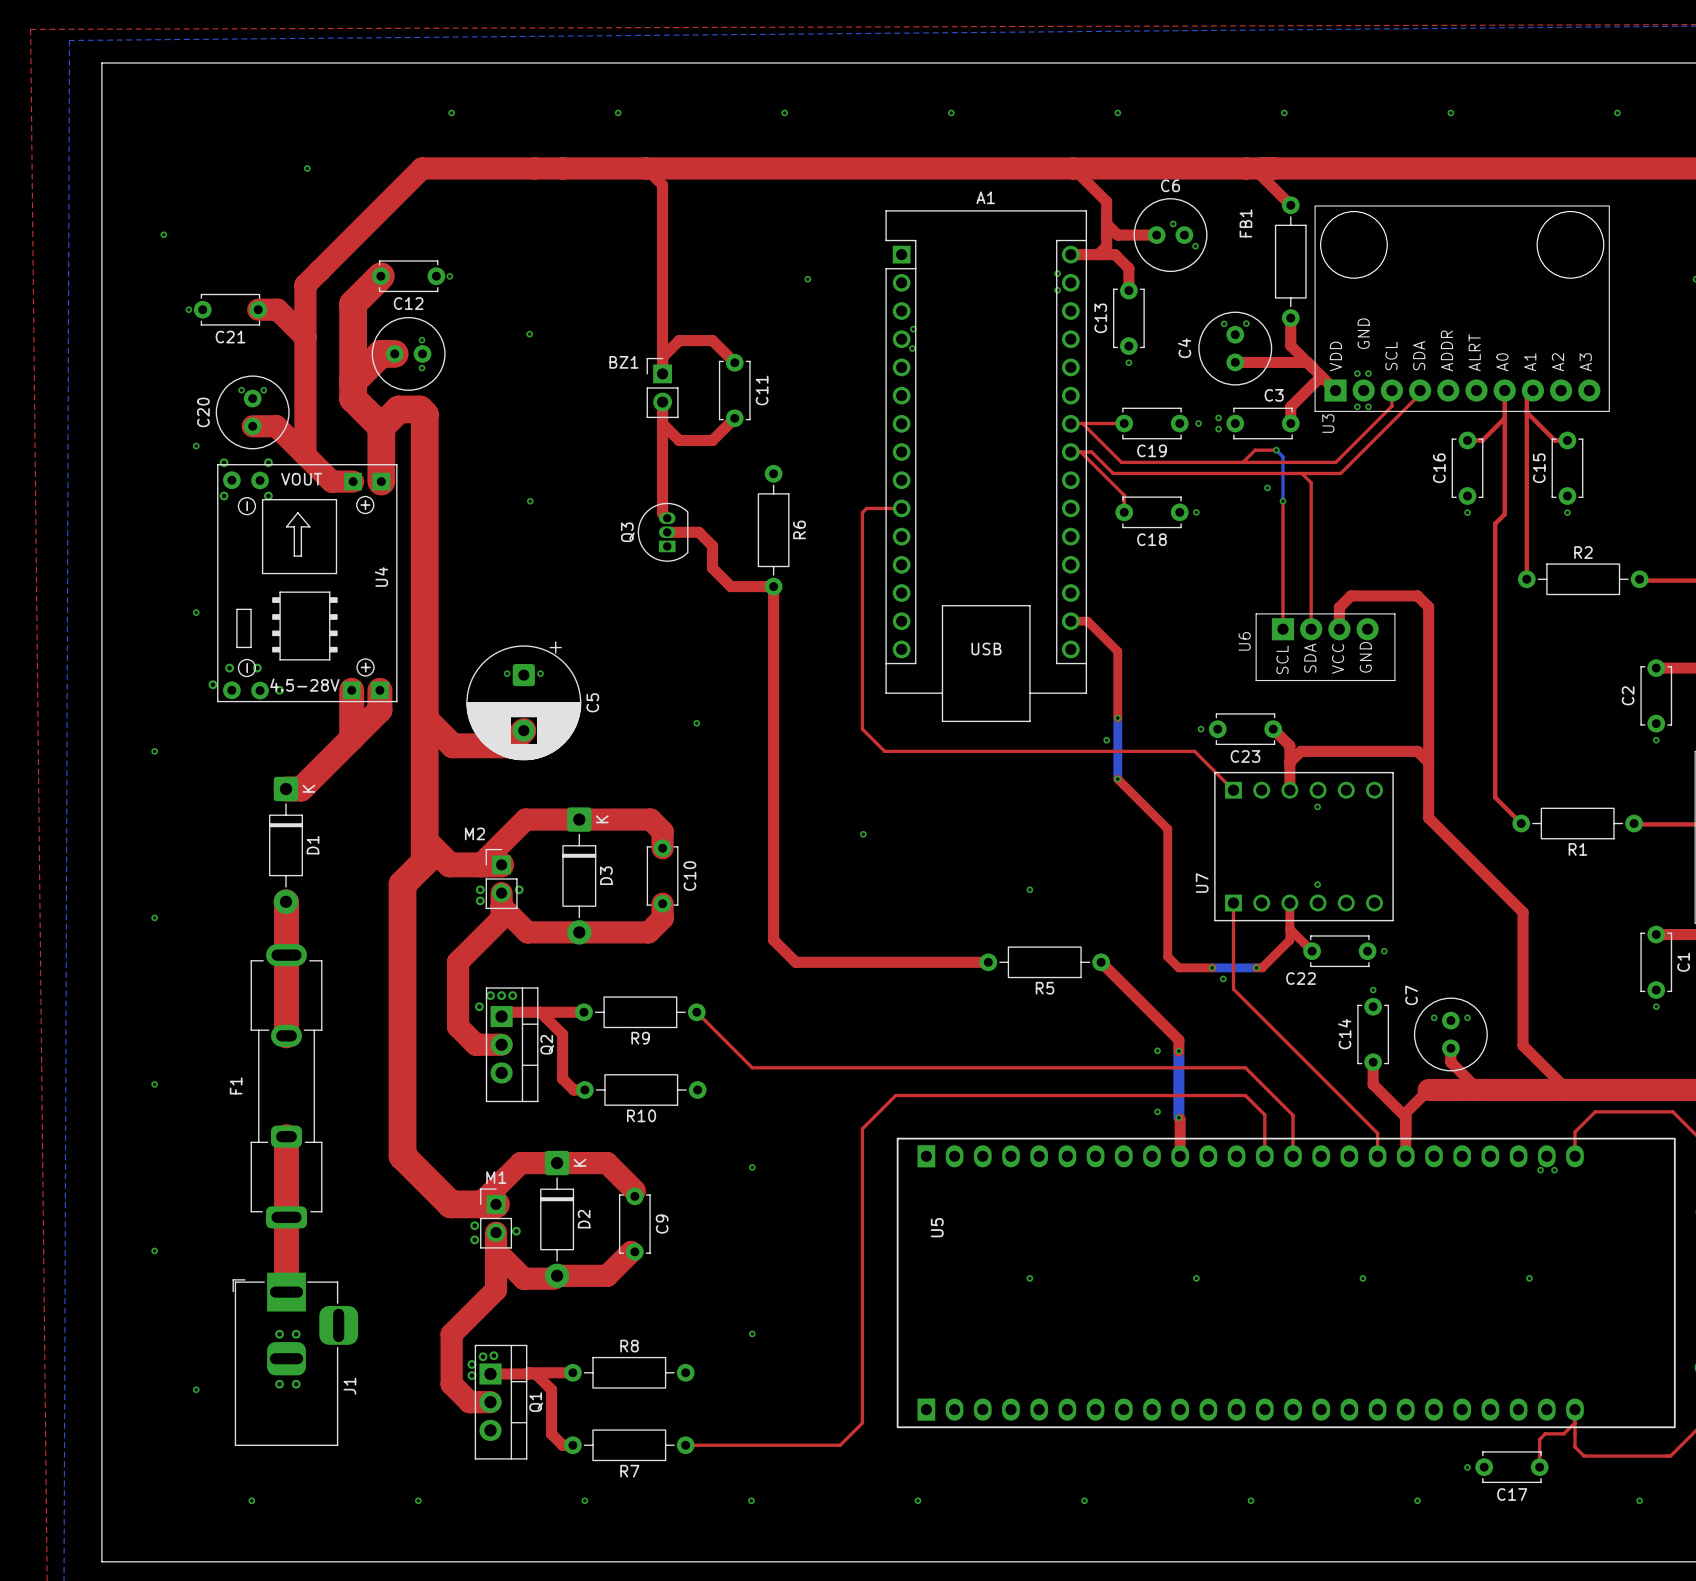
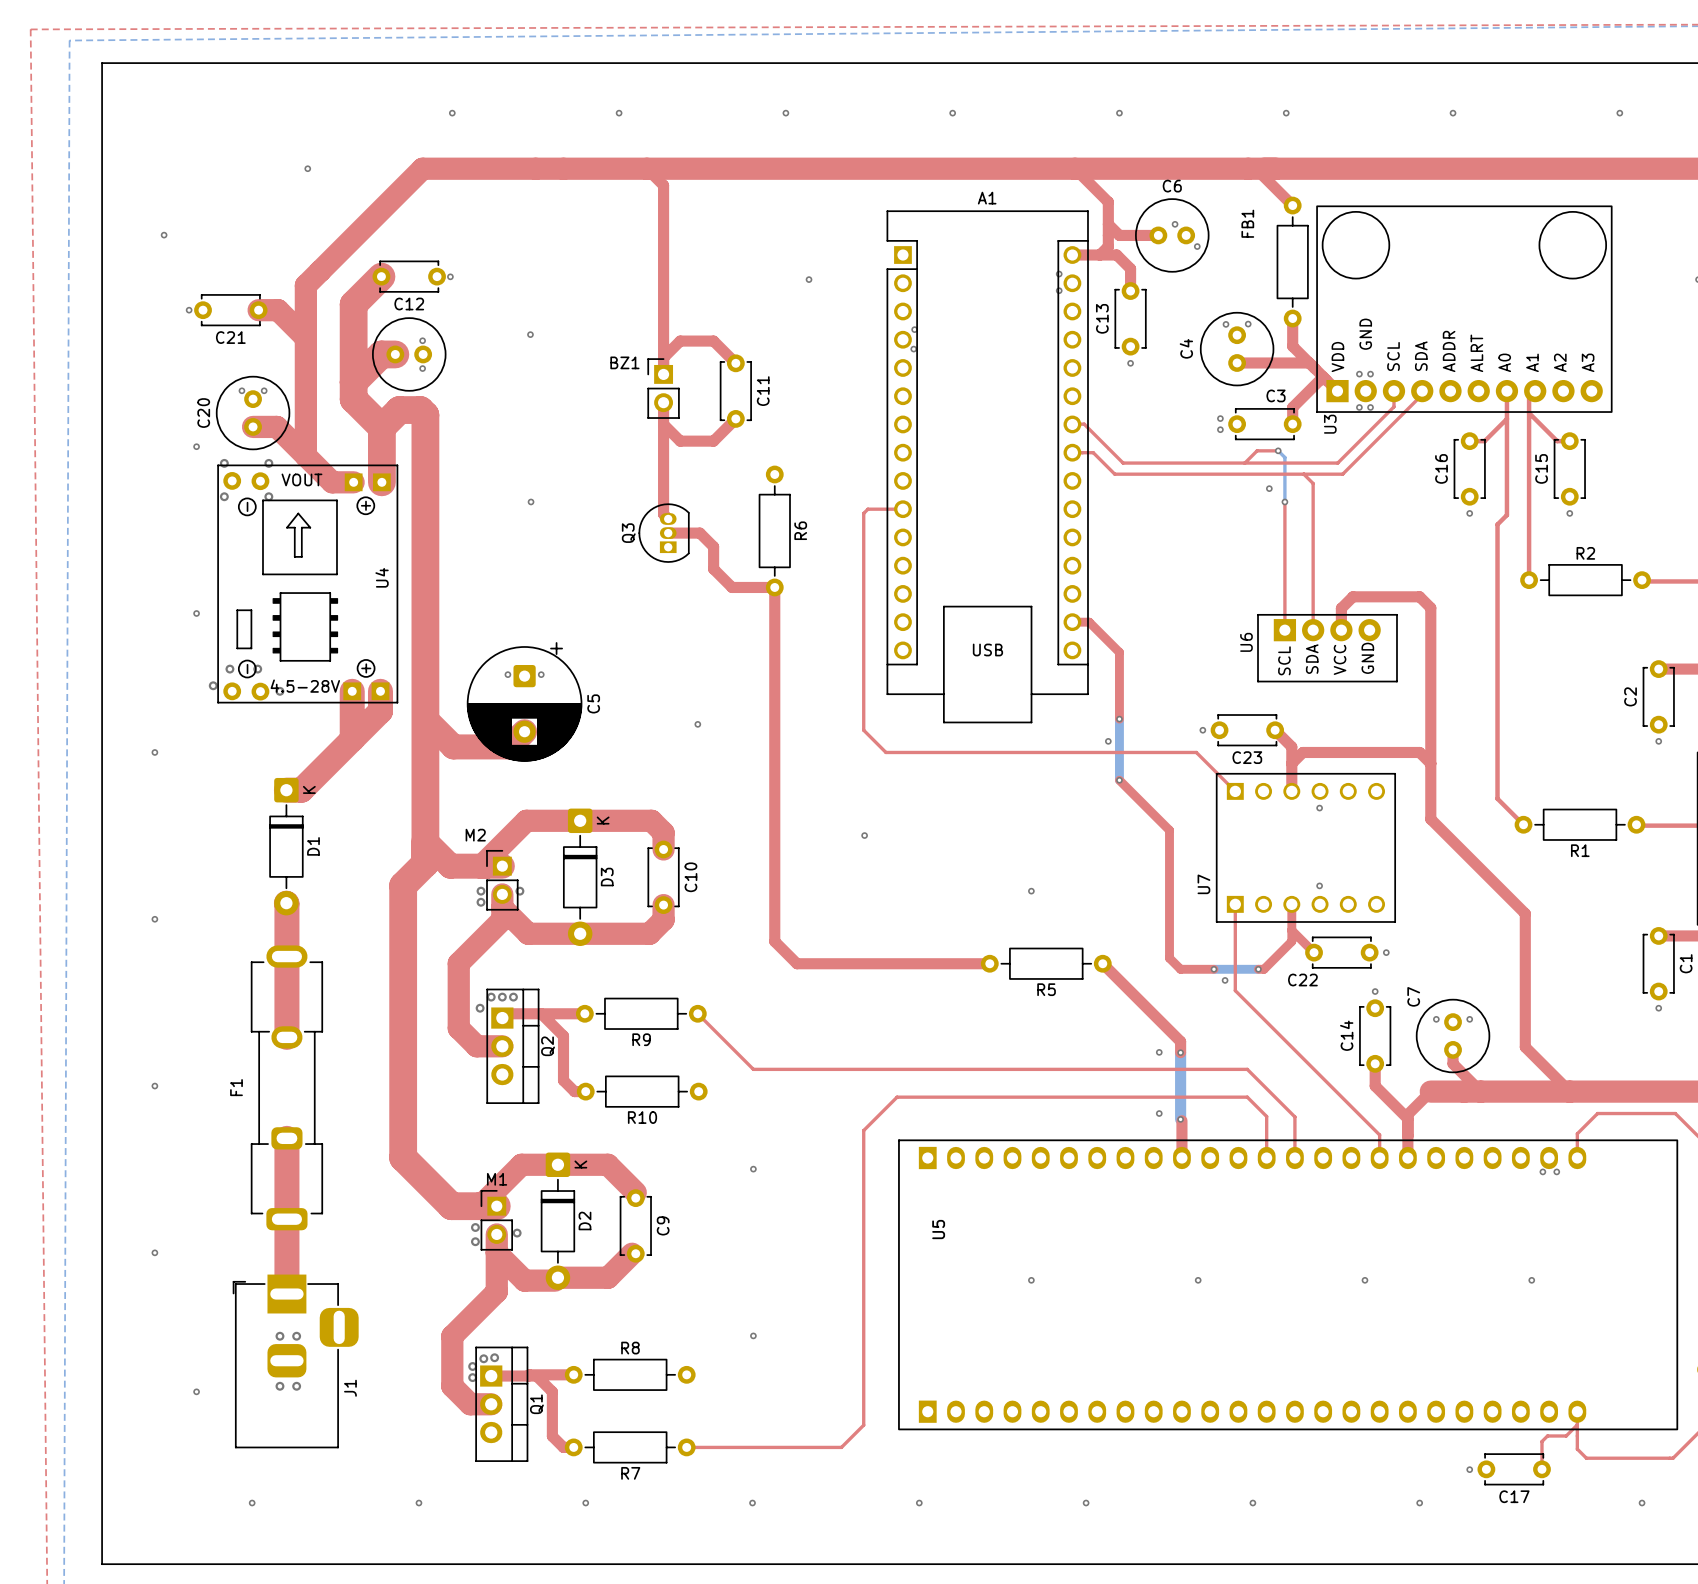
top track: (1082, 423) (1124, 423) -> none
C19: (1151, 423) -> none
via: (1198, 423) -> none
top track: (1080, 452) (1124, 495) (1124, 512) -> none
C18: (1151, 512) -> none
via: (1196, 512) -> none

